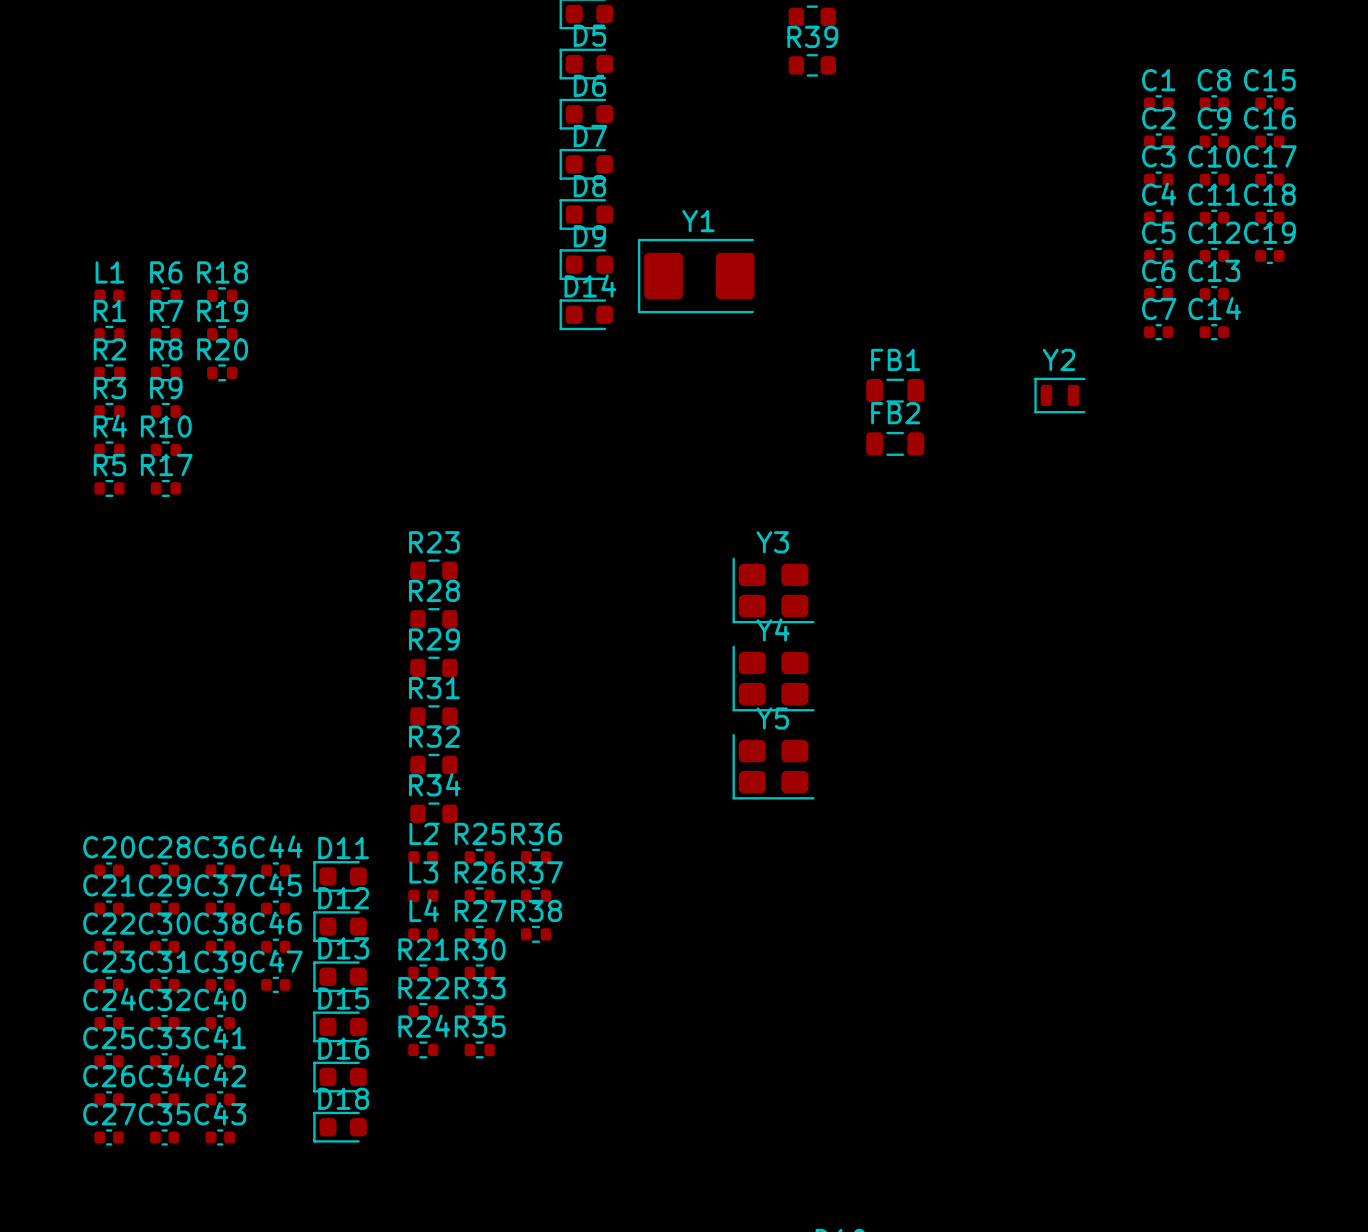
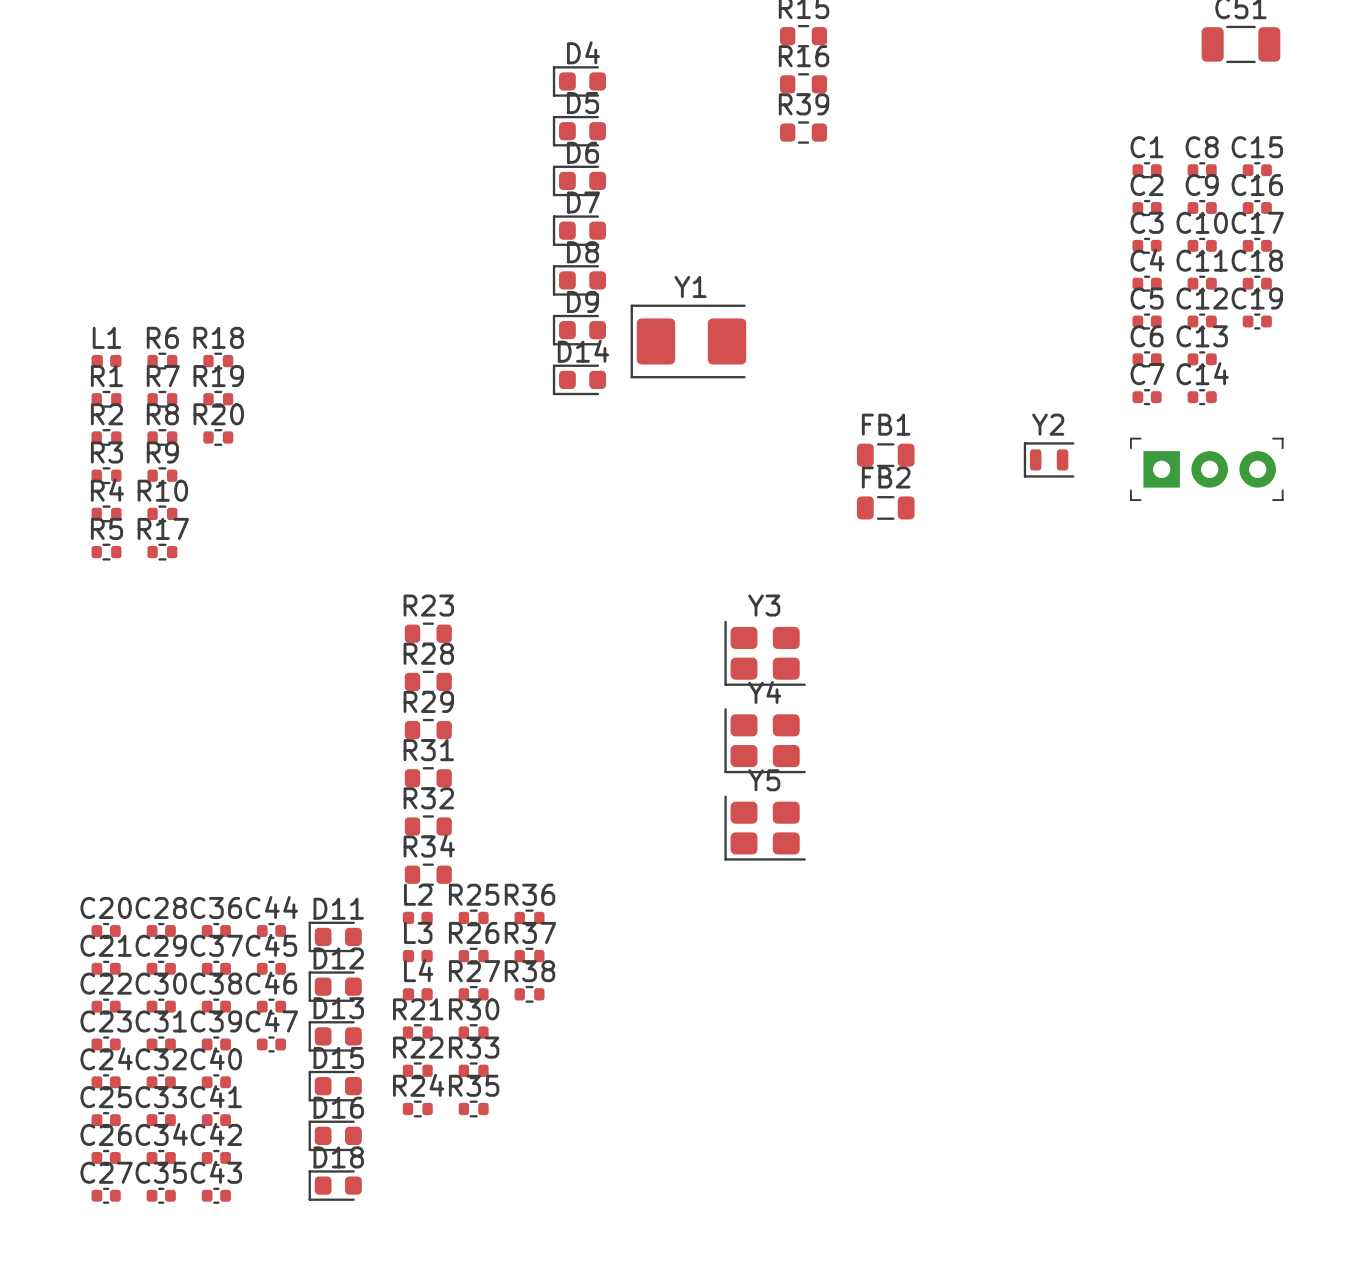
part: none -> (1206, 469)

